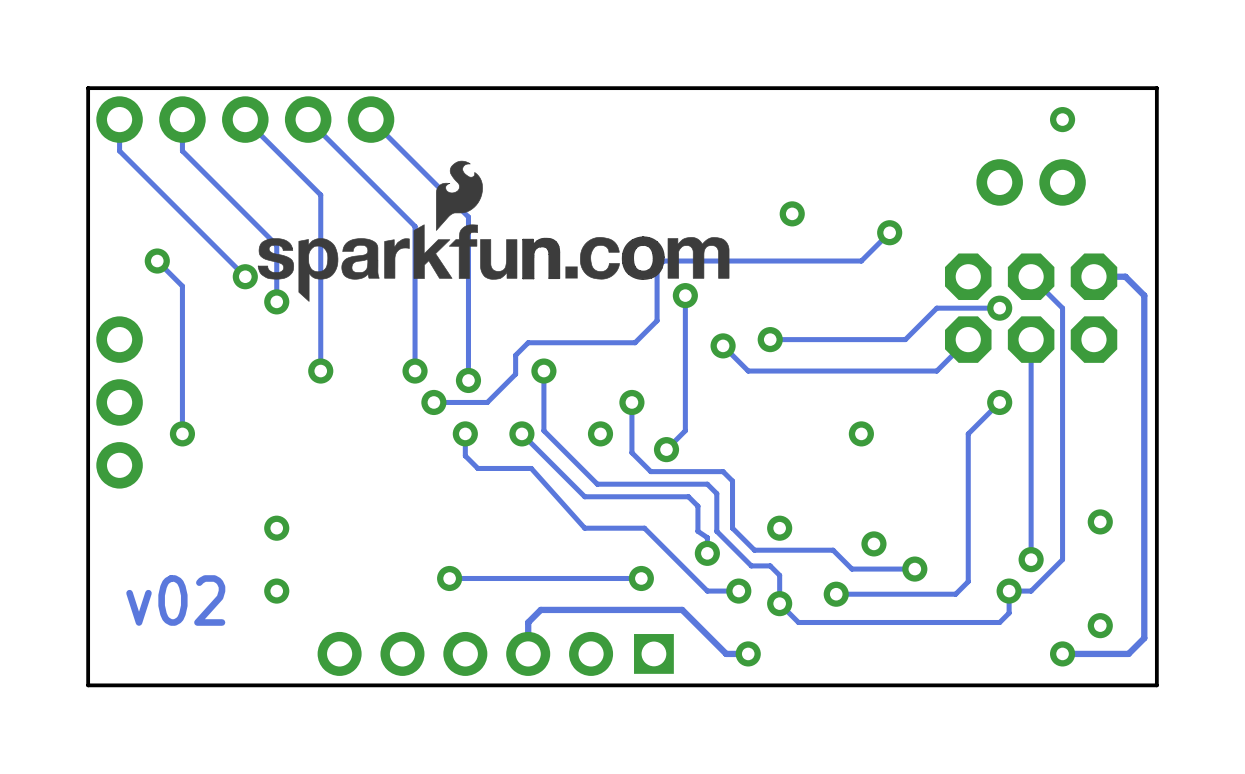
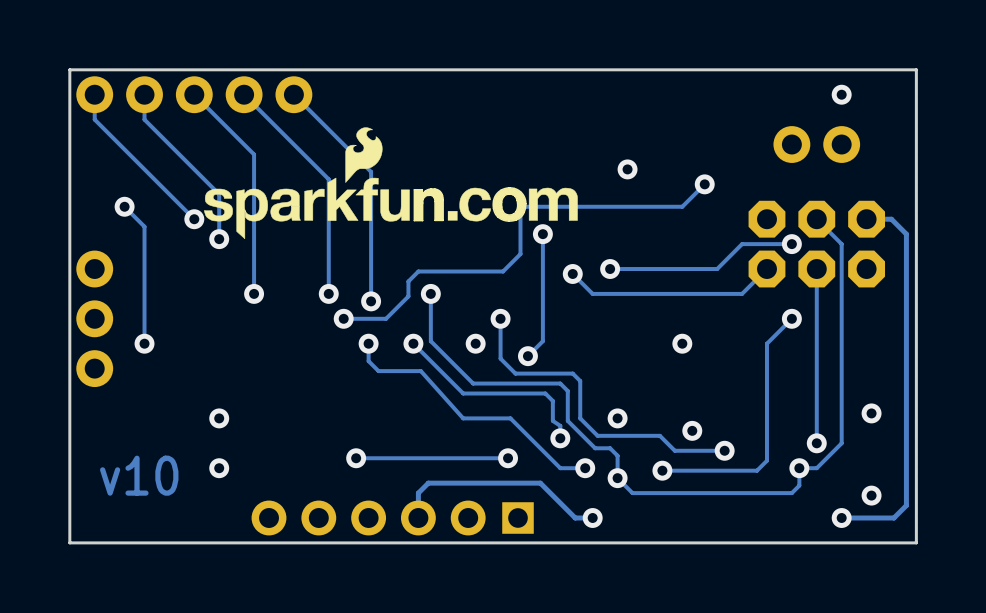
text: v02 (175, 600) -> v10 (139, 475)

